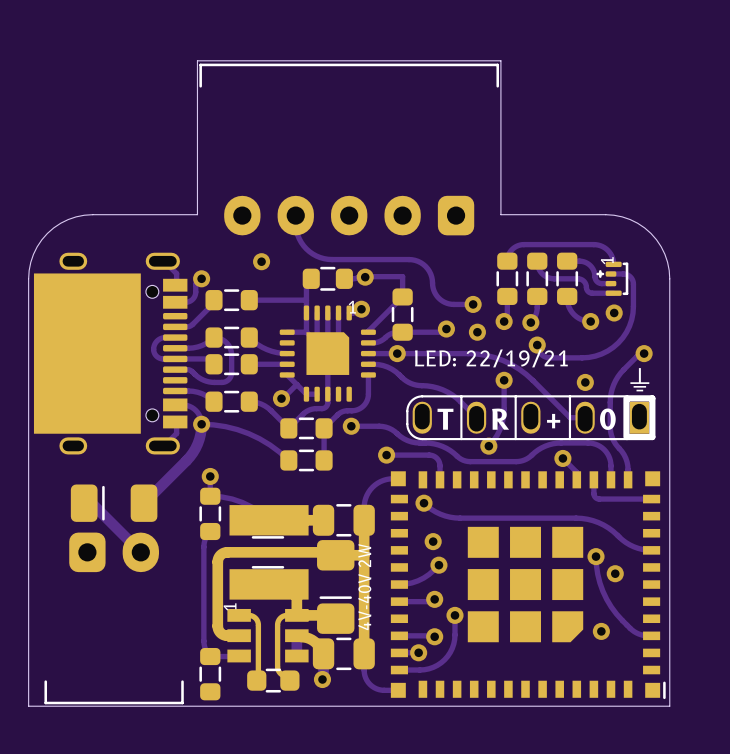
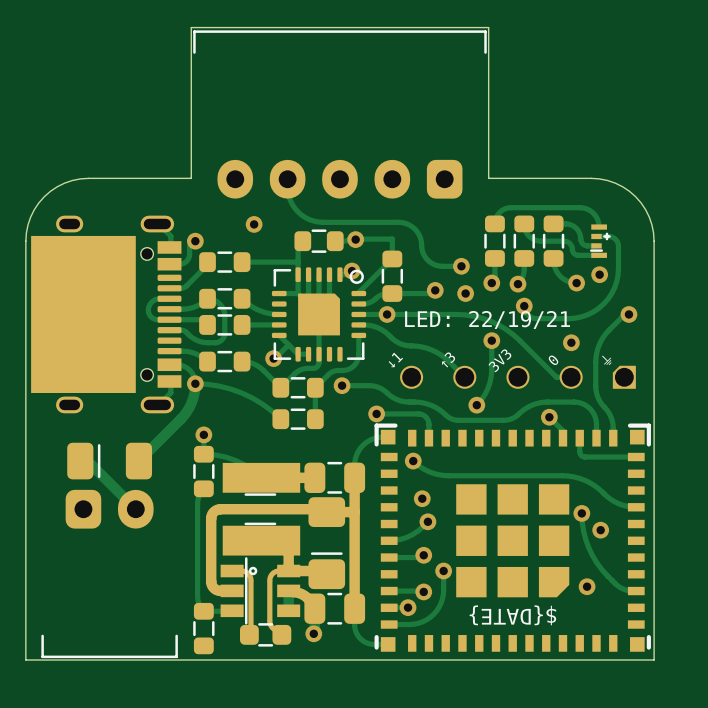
part footprint: [596, 261, 629, 296] -> [590, 224, 611, 258]
part footprint: [279, 305, 376, 402] -> [271, 267, 367, 362]
part footprint: [406, 395, 656, 441] -> [400, 365, 636, 389]
part footprint: [390, 471, 666, 700] -> [374, 423, 651, 652]
part footprint: [212, 504, 375, 691] -> [205, 462, 366, 645]

